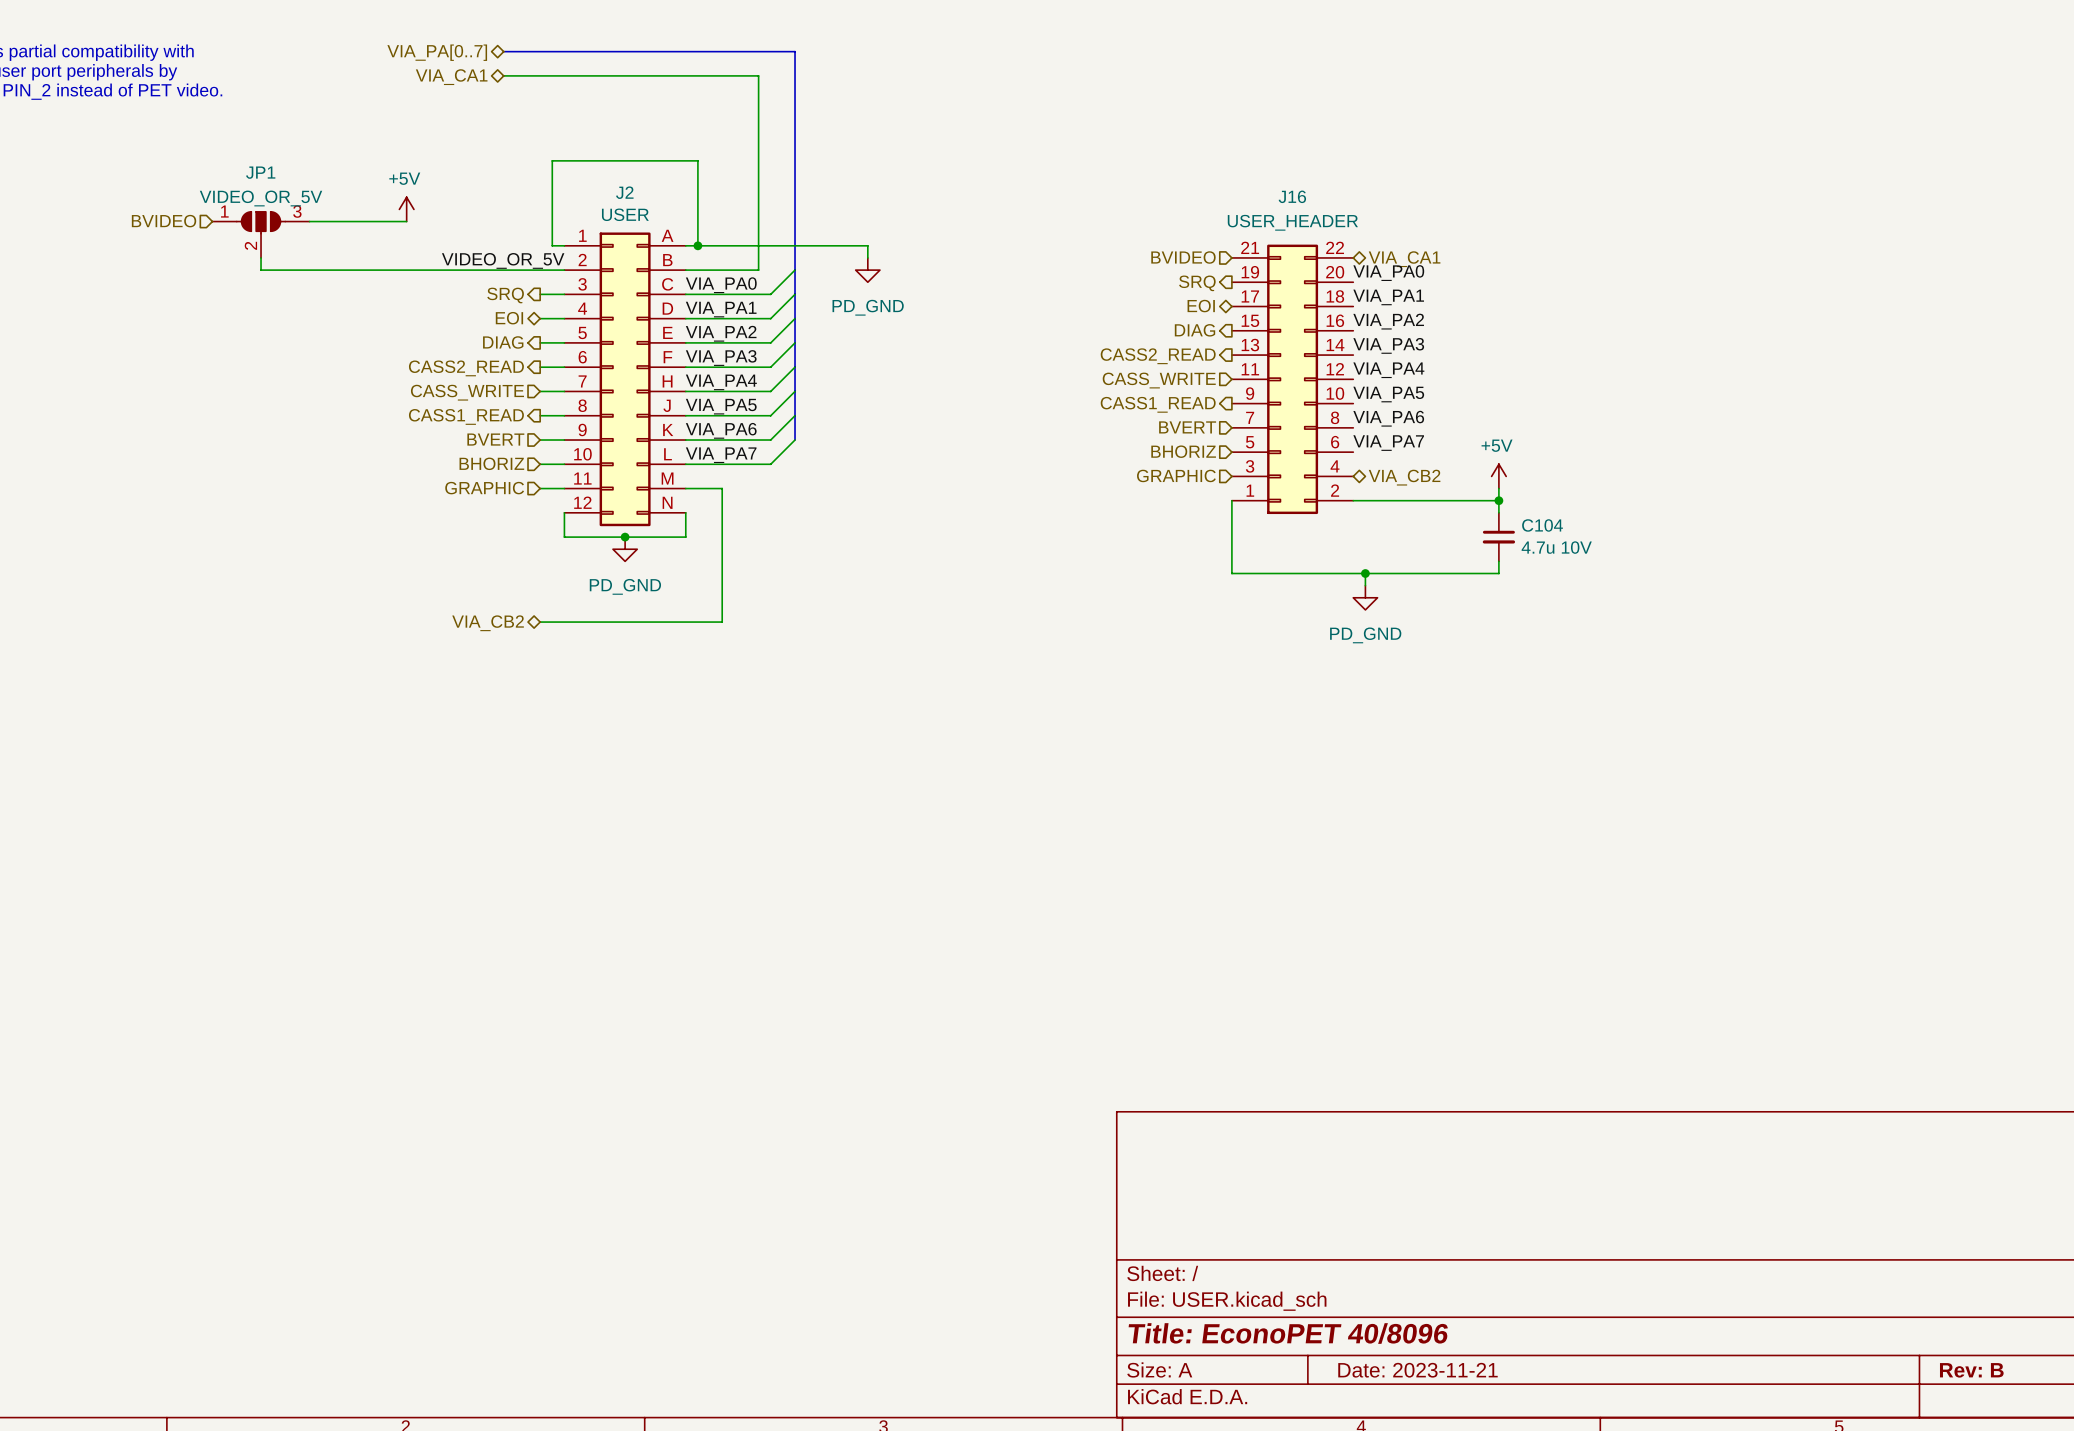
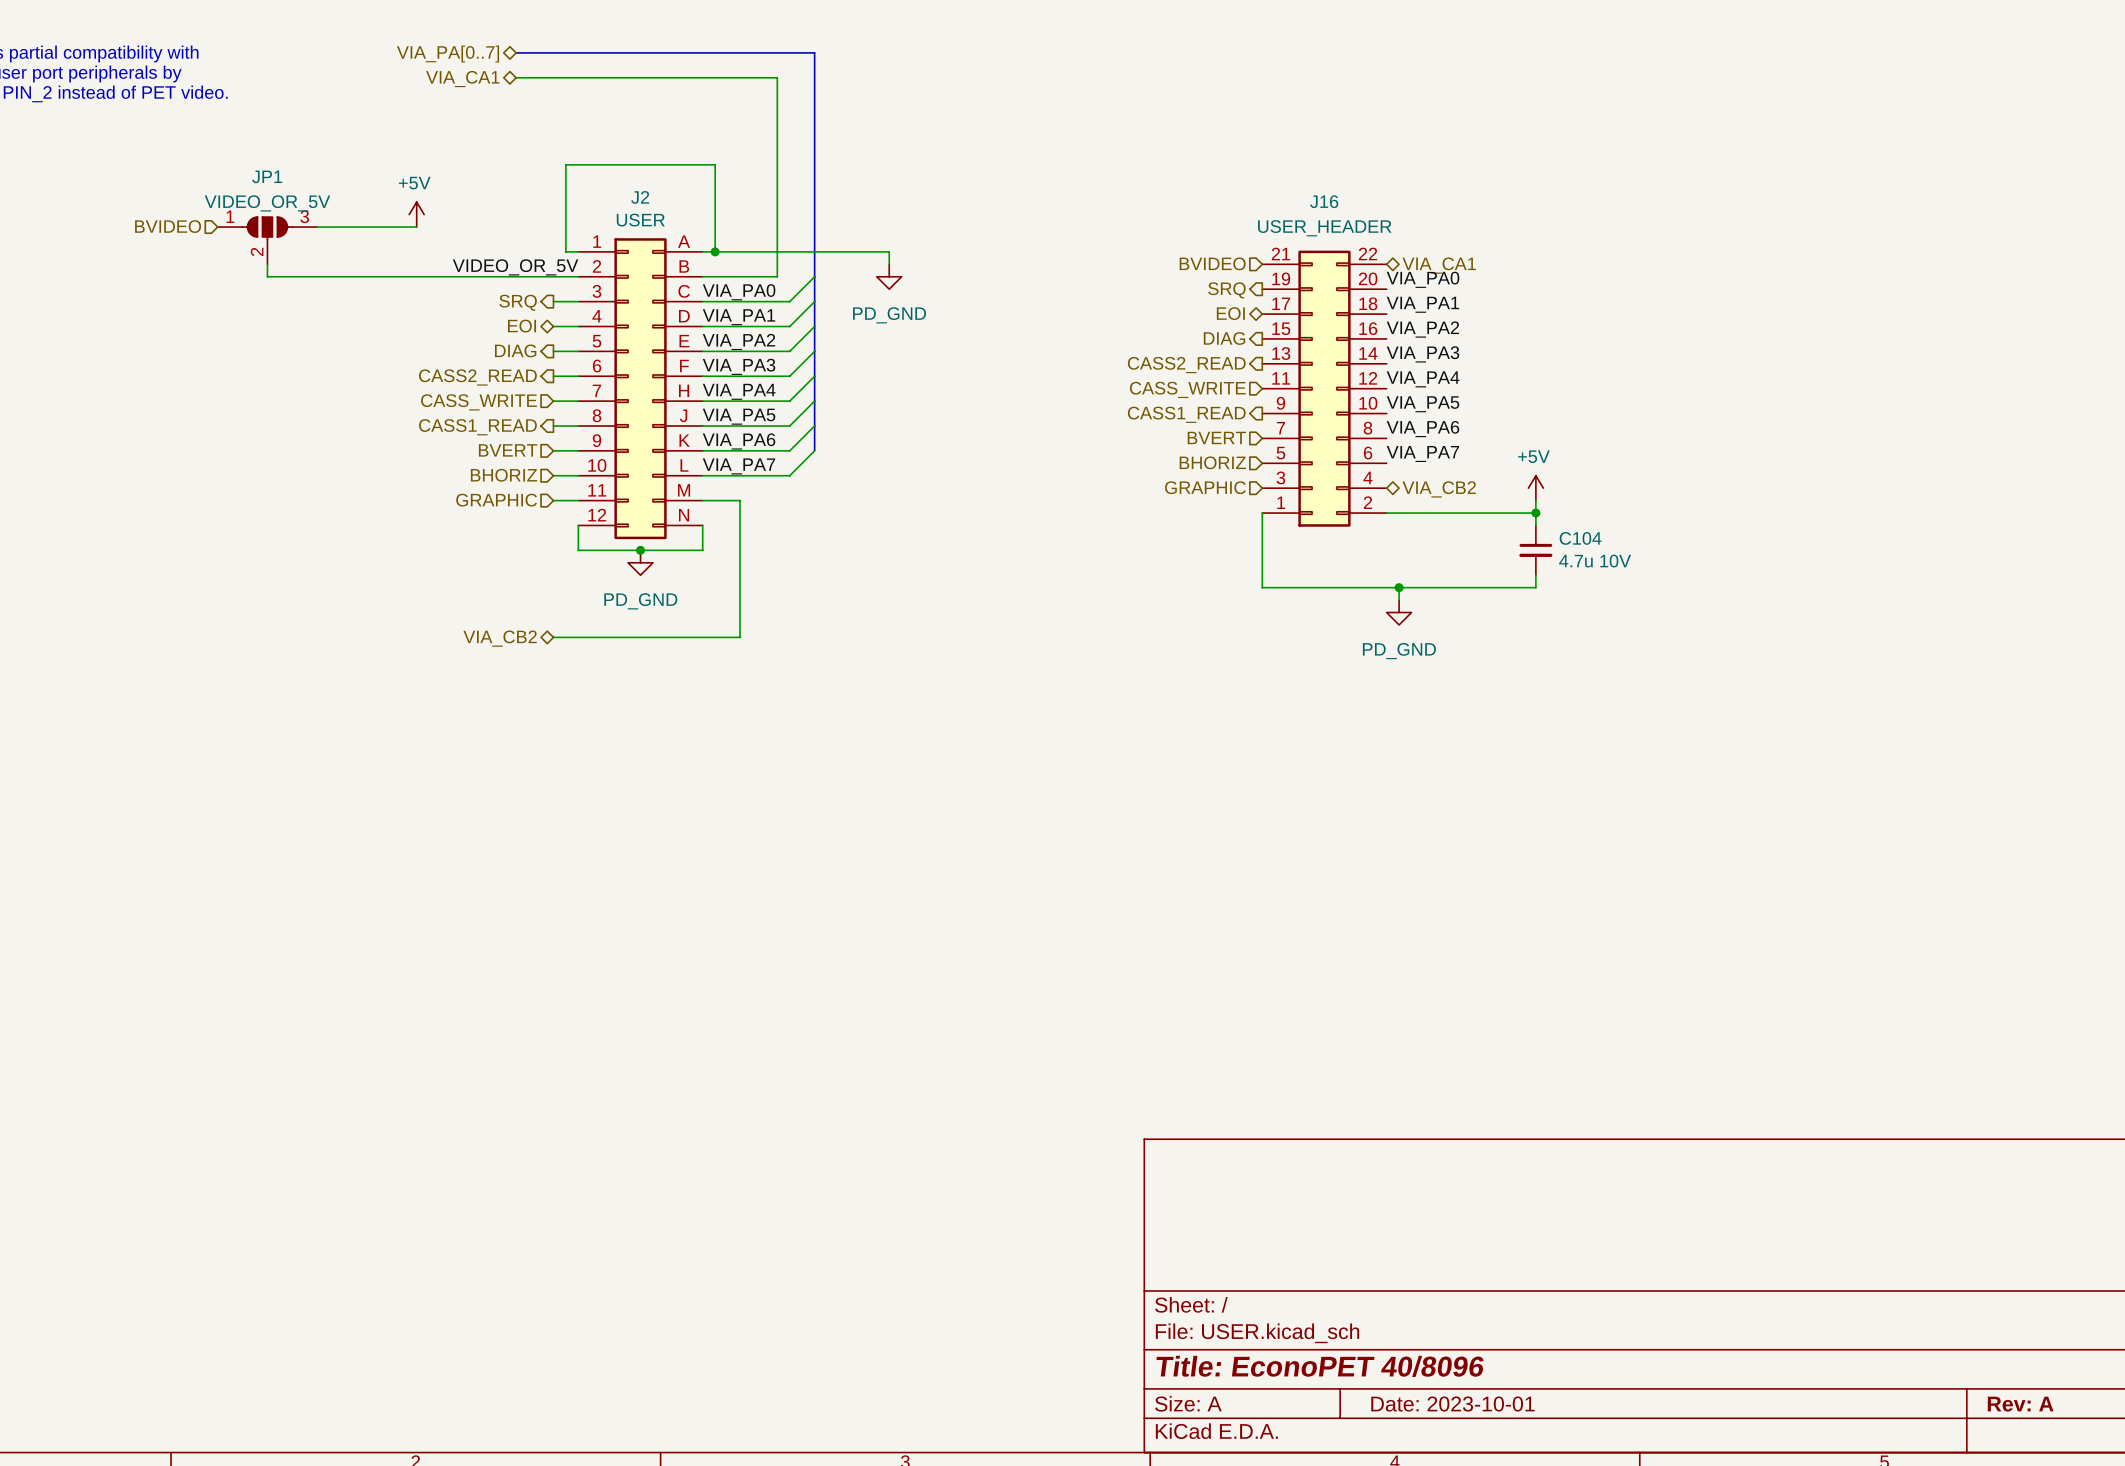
title block: Date: 2023-11-21 (1417, 1370) -> Date: 2023-10-01 (1452, 1404)
title block: Rev: B (1971, 1370) -> Rev: A (2020, 1404)

